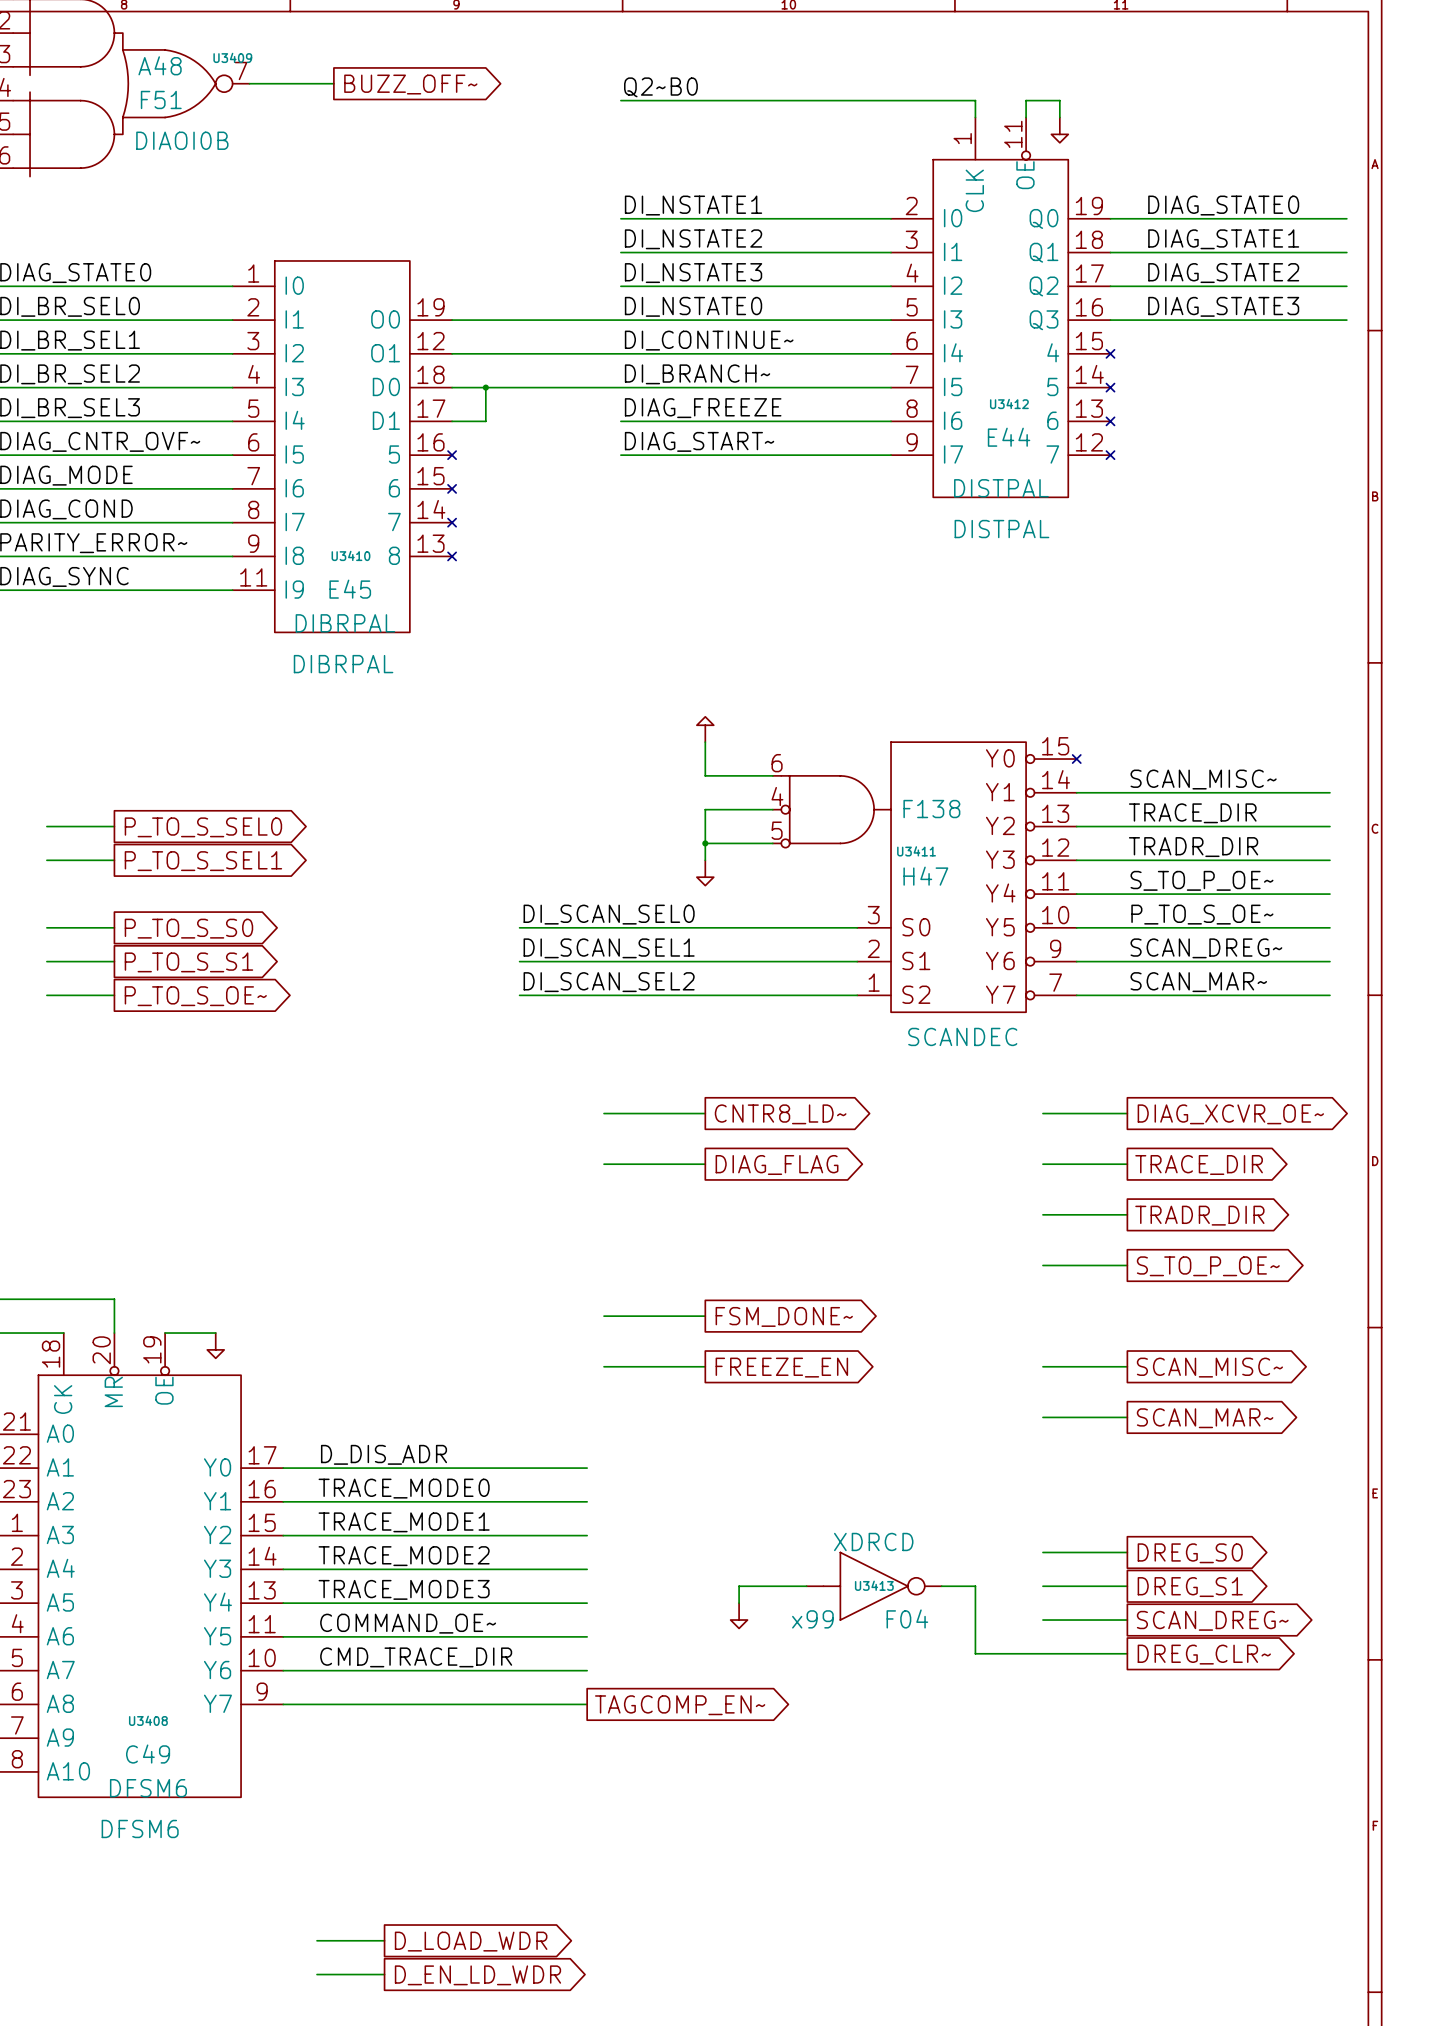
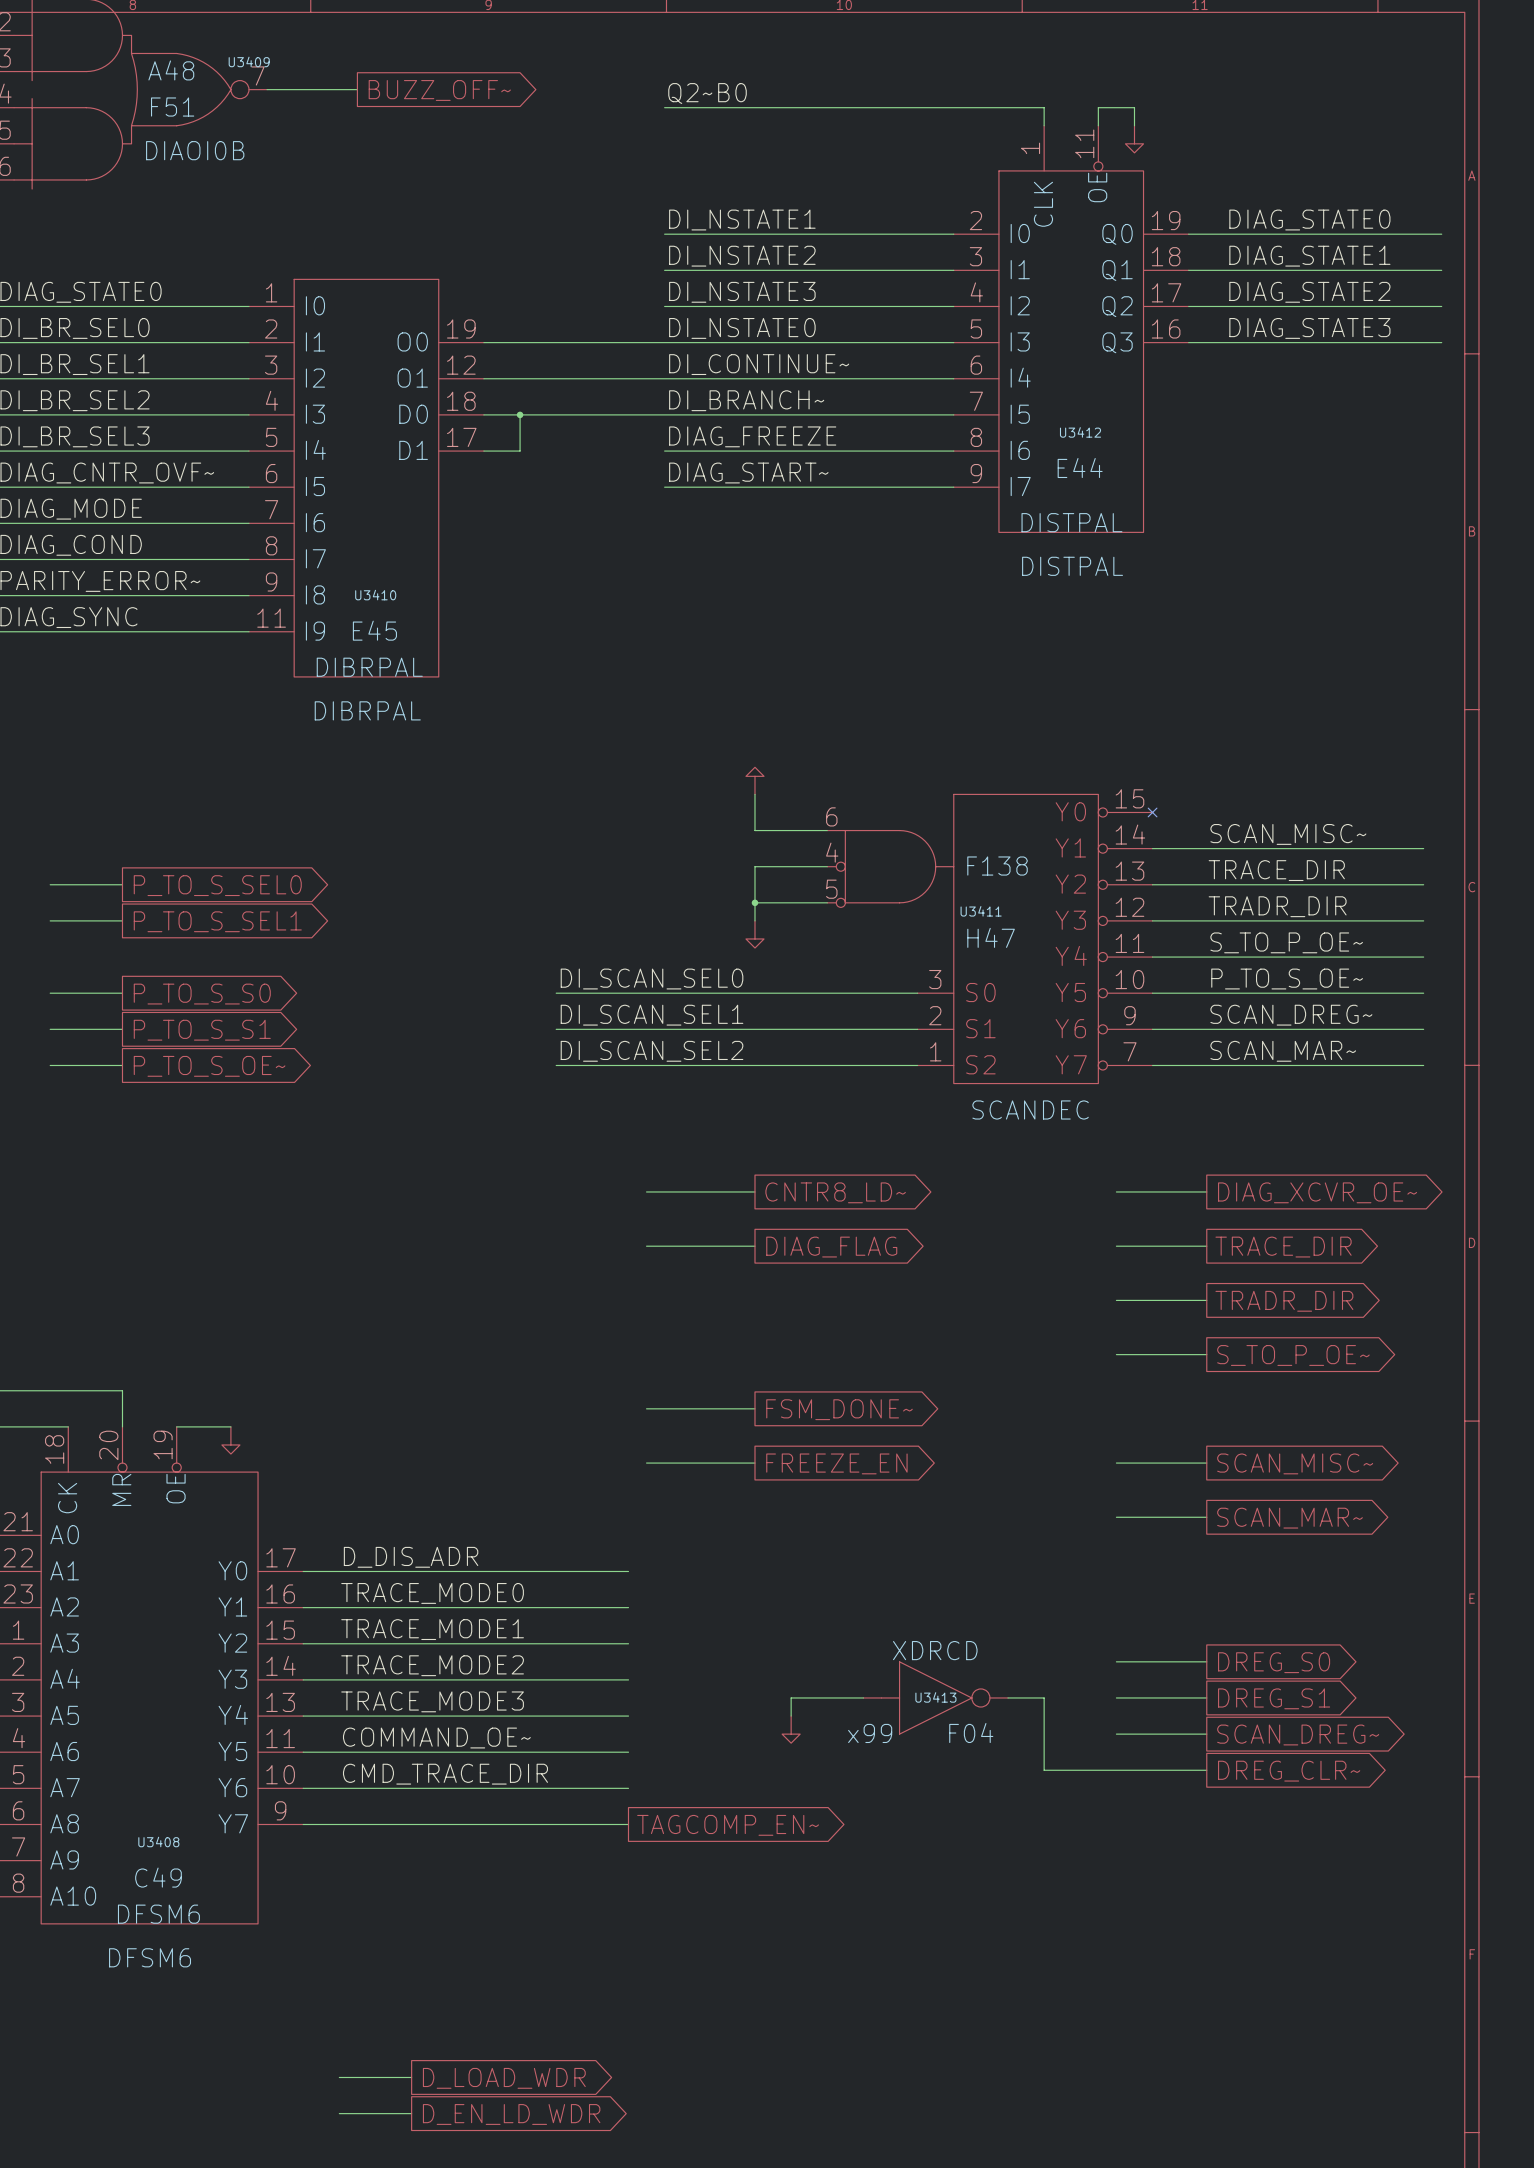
U3412 symbol: [891, 117, 1111, 498] -> [953, 125, 1189, 533]
U3410 symbol: [232, 260, 453, 633] -> [248, 279, 484, 677]
no-connect mark: (1110, 353) -> none
no-connect mark: (1110, 387) -> none
no-connect mark: (1110, 421) -> none
no-connect mark: (452, 455) -> none
no-connect mark: (1110, 455) -> none
no-connect mark: (452, 488) -> none
no-connect mark: (452, 522) -> none
no-connect mark: (452, 556) -> none

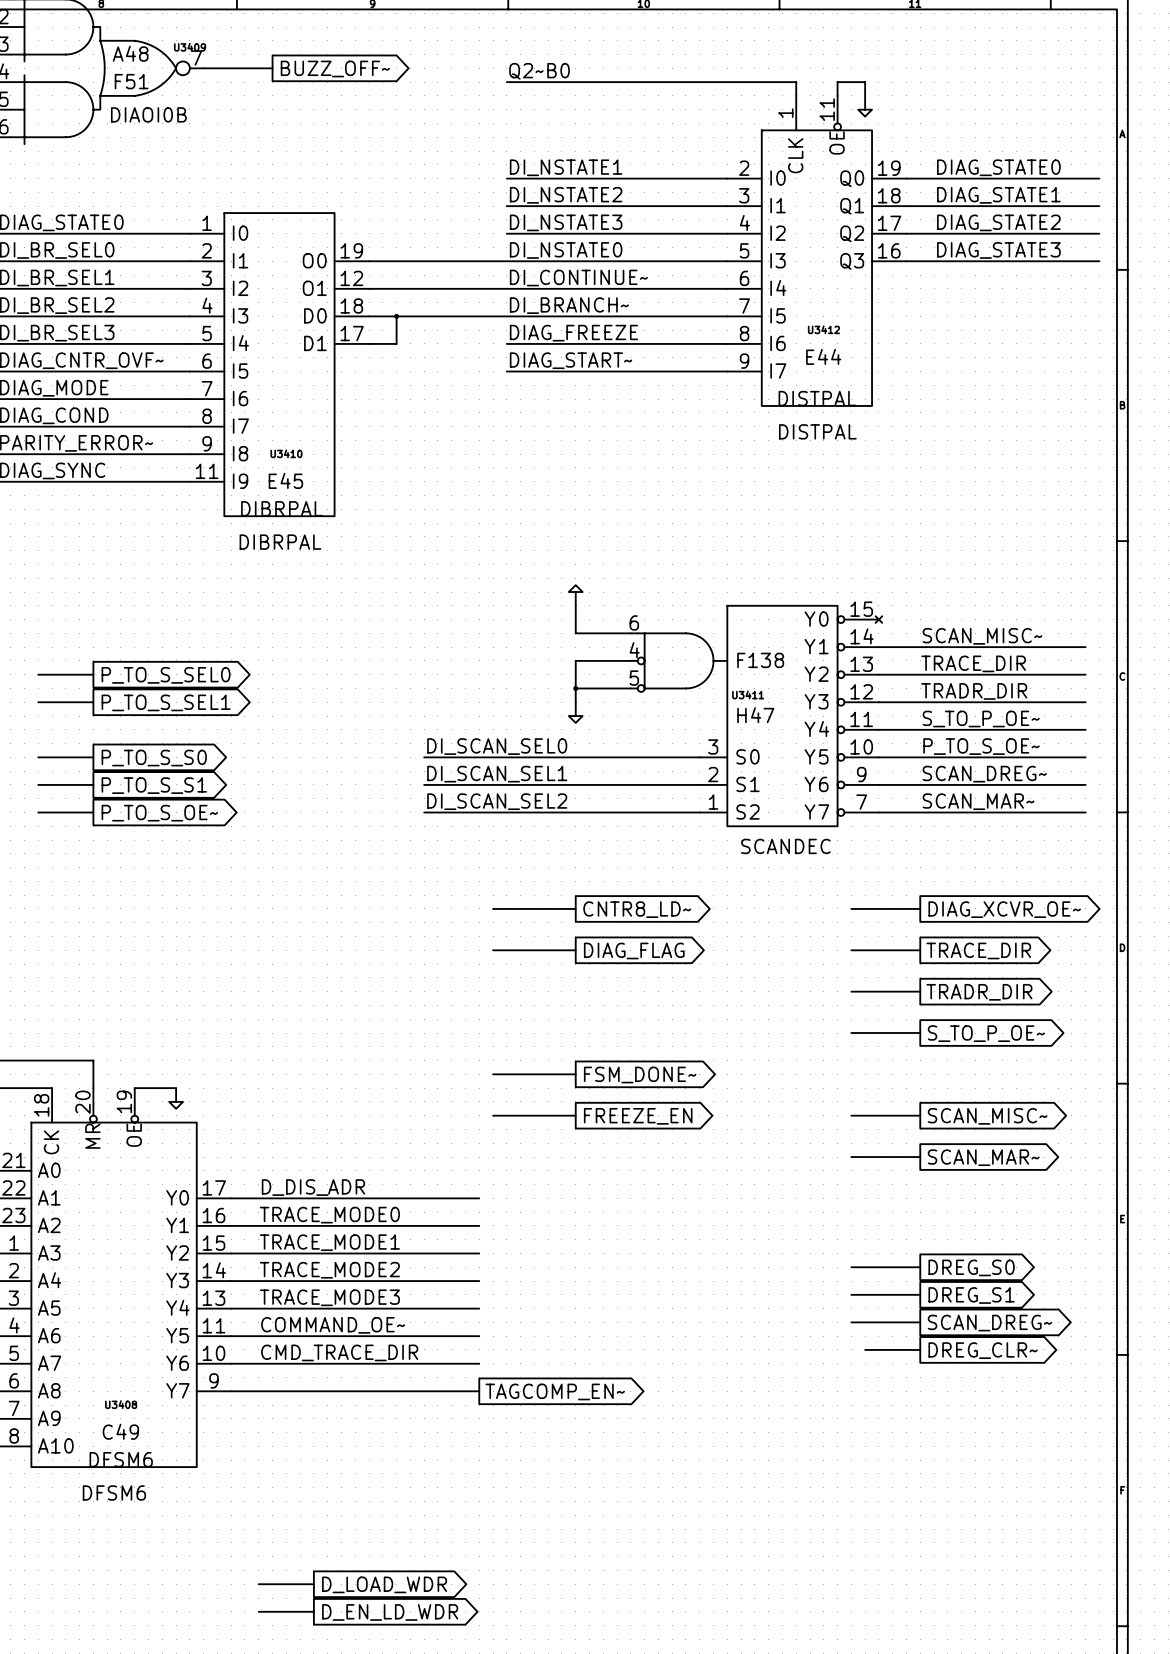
wire: (863, 1697) (791, 1697) (791, 1716) -> none
U3413: F04 (935, 1697) -> none
wire: (1007, 1697) (1044, 1697) (1044, 1770) (1134, 1770) -> none
power symbol: (791, 1729) -> none

